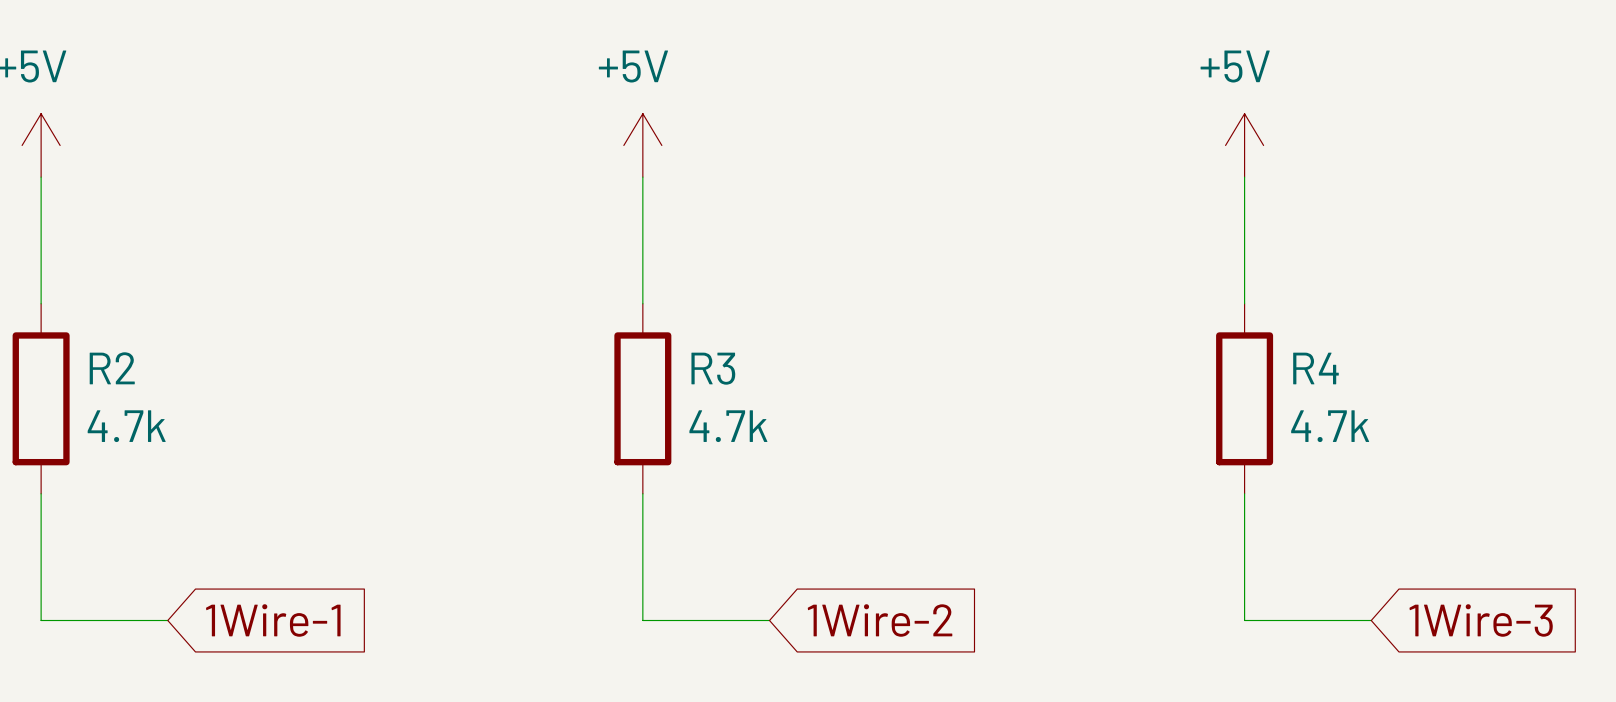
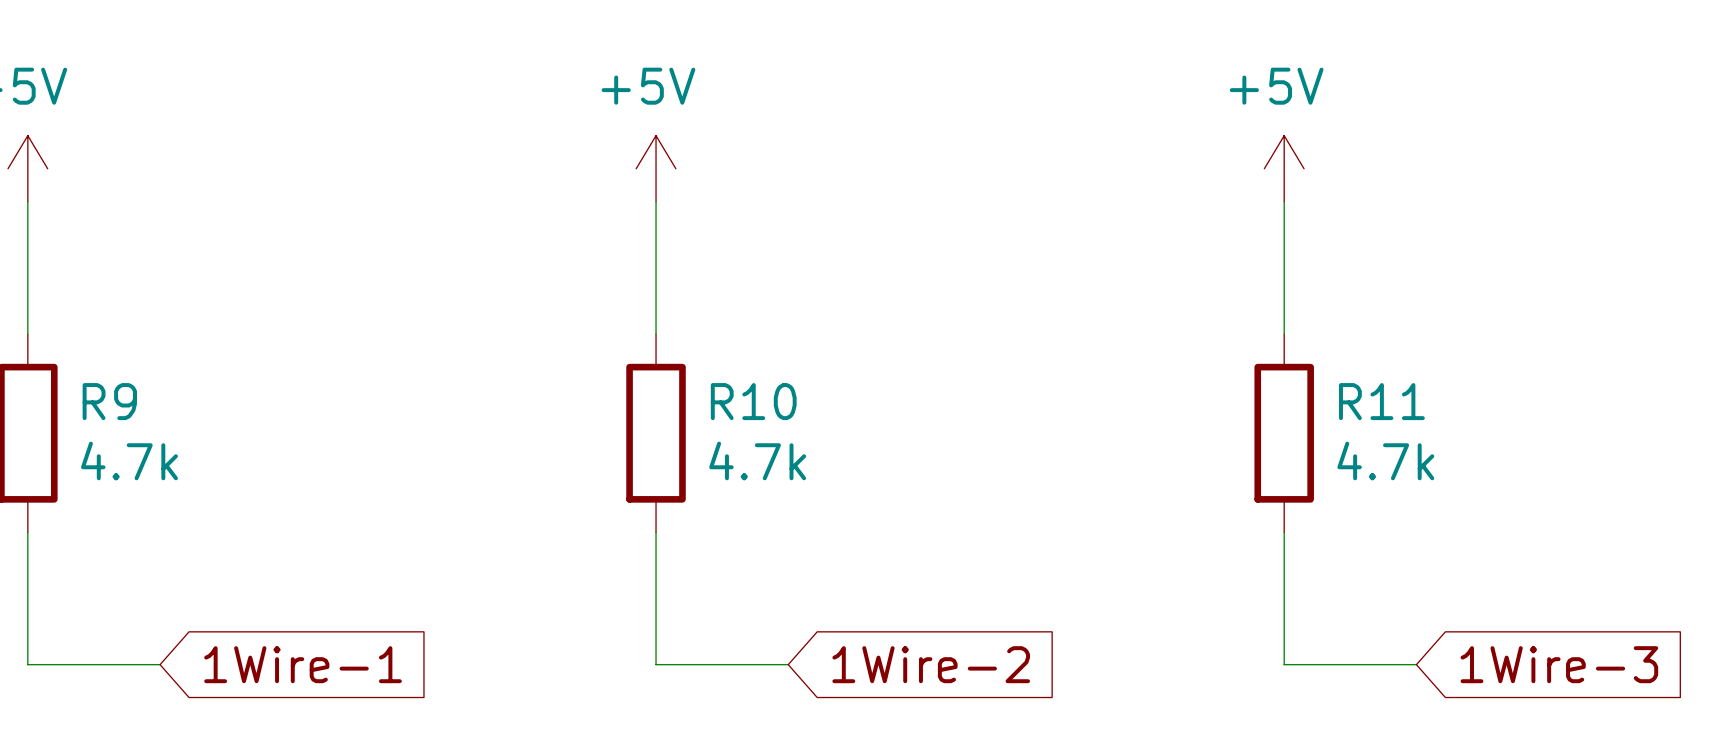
R2 name: R2 (112, 368) -> R9 (109, 401)
R3 name: R3 (713, 368) -> R10 (753, 401)
R4 name: R4 (1315, 368) -> R11 (1381, 401)

